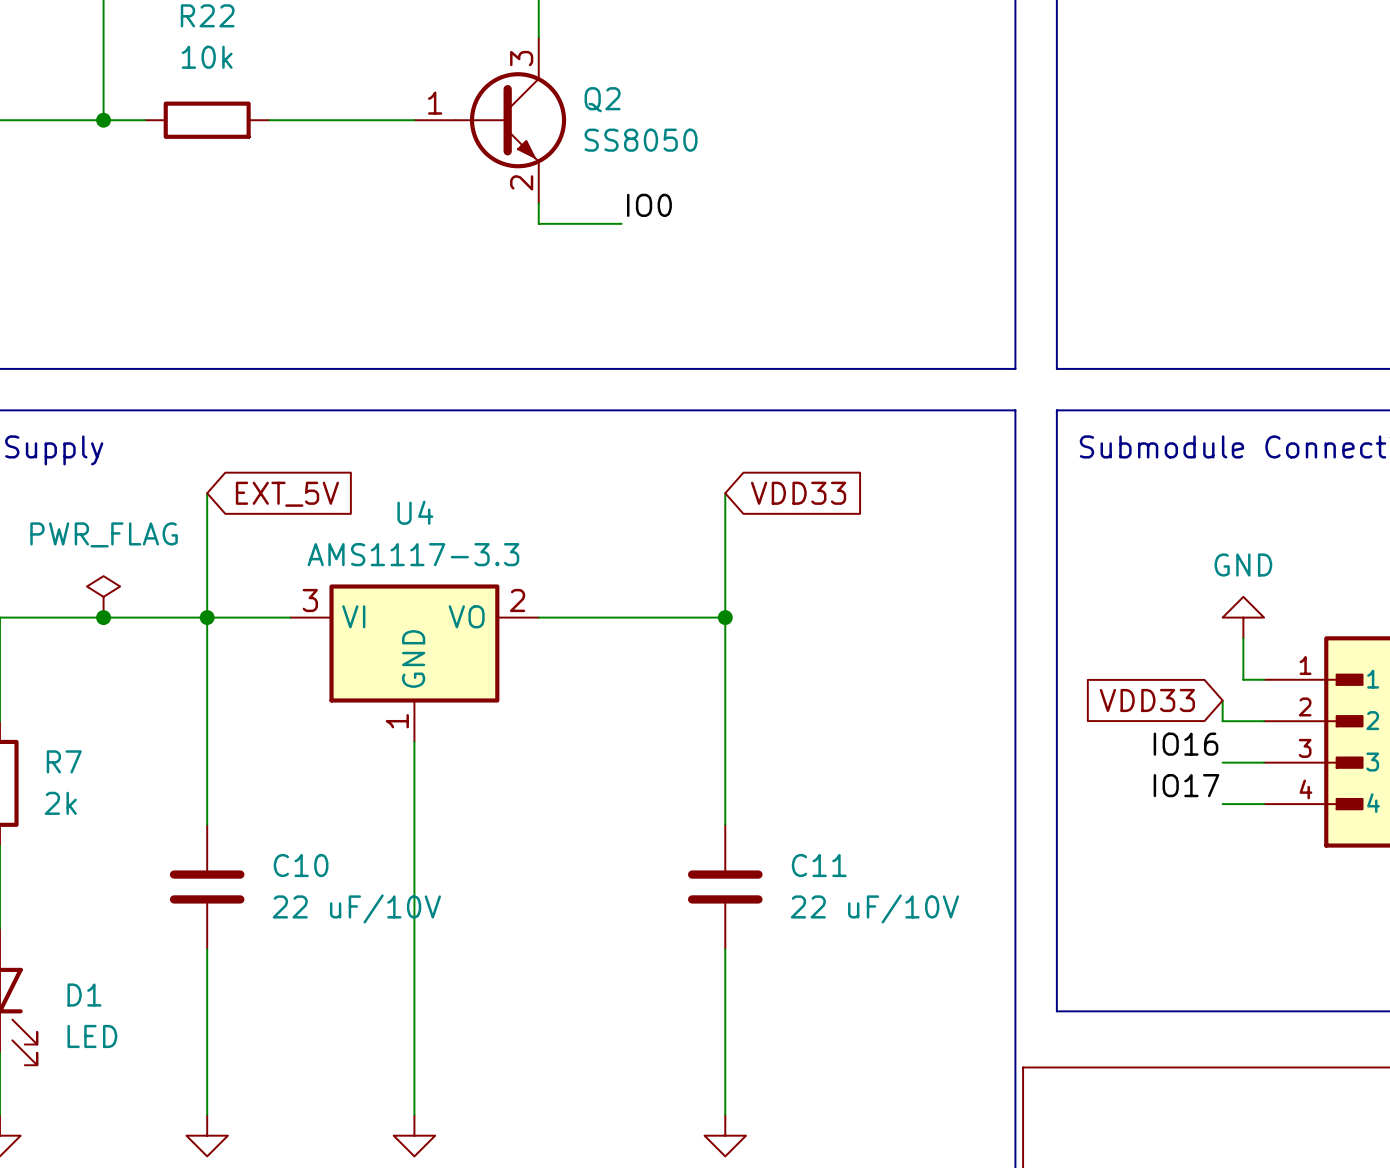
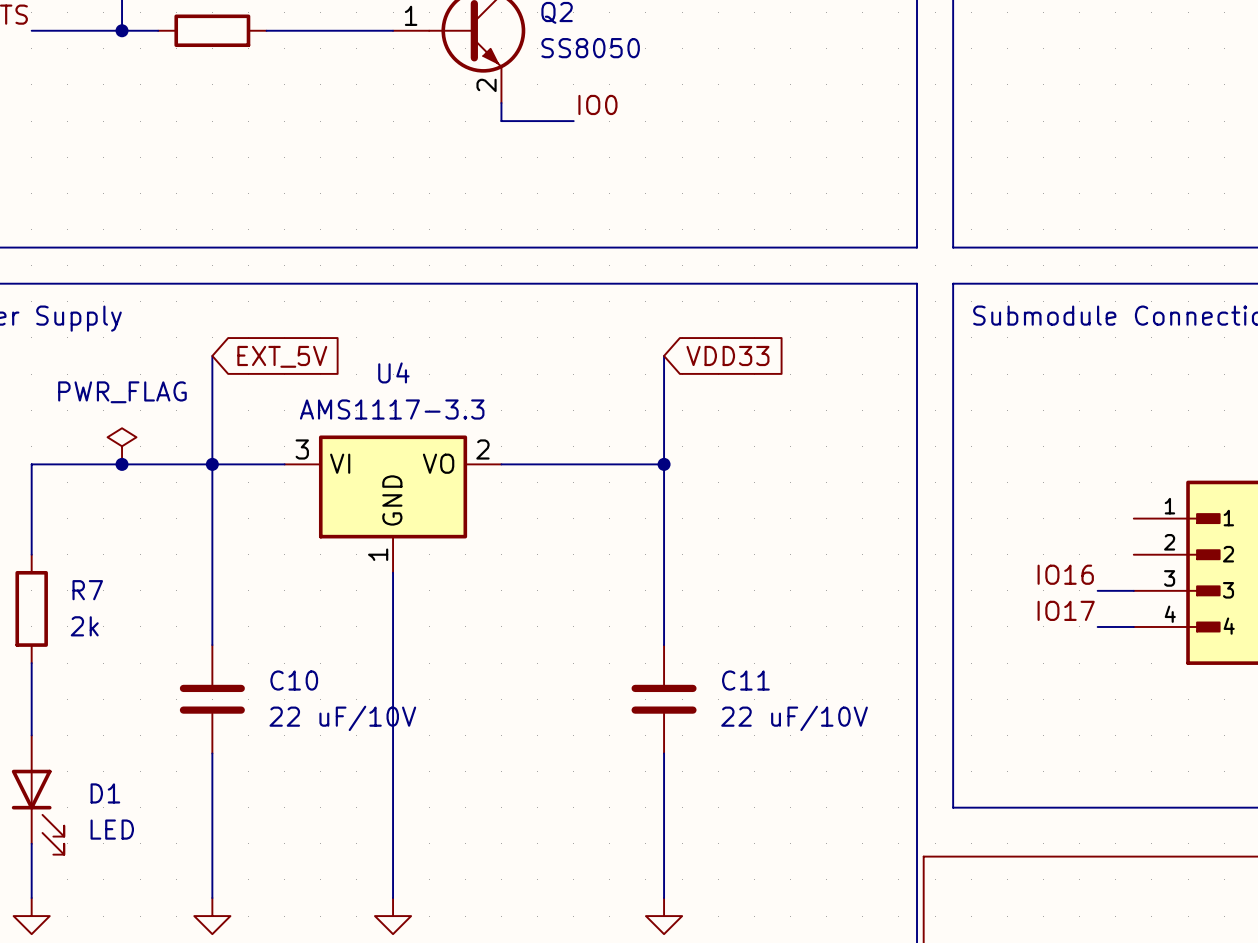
power symbol: GND (1243, 617) -> none
wire: (1243, 638) (1243, 679) (1264, 679) -> none
global label: VDD33 (1147, 700) -> none
wire: (1222, 700) (1222, 721) (1264, 721) -> none

